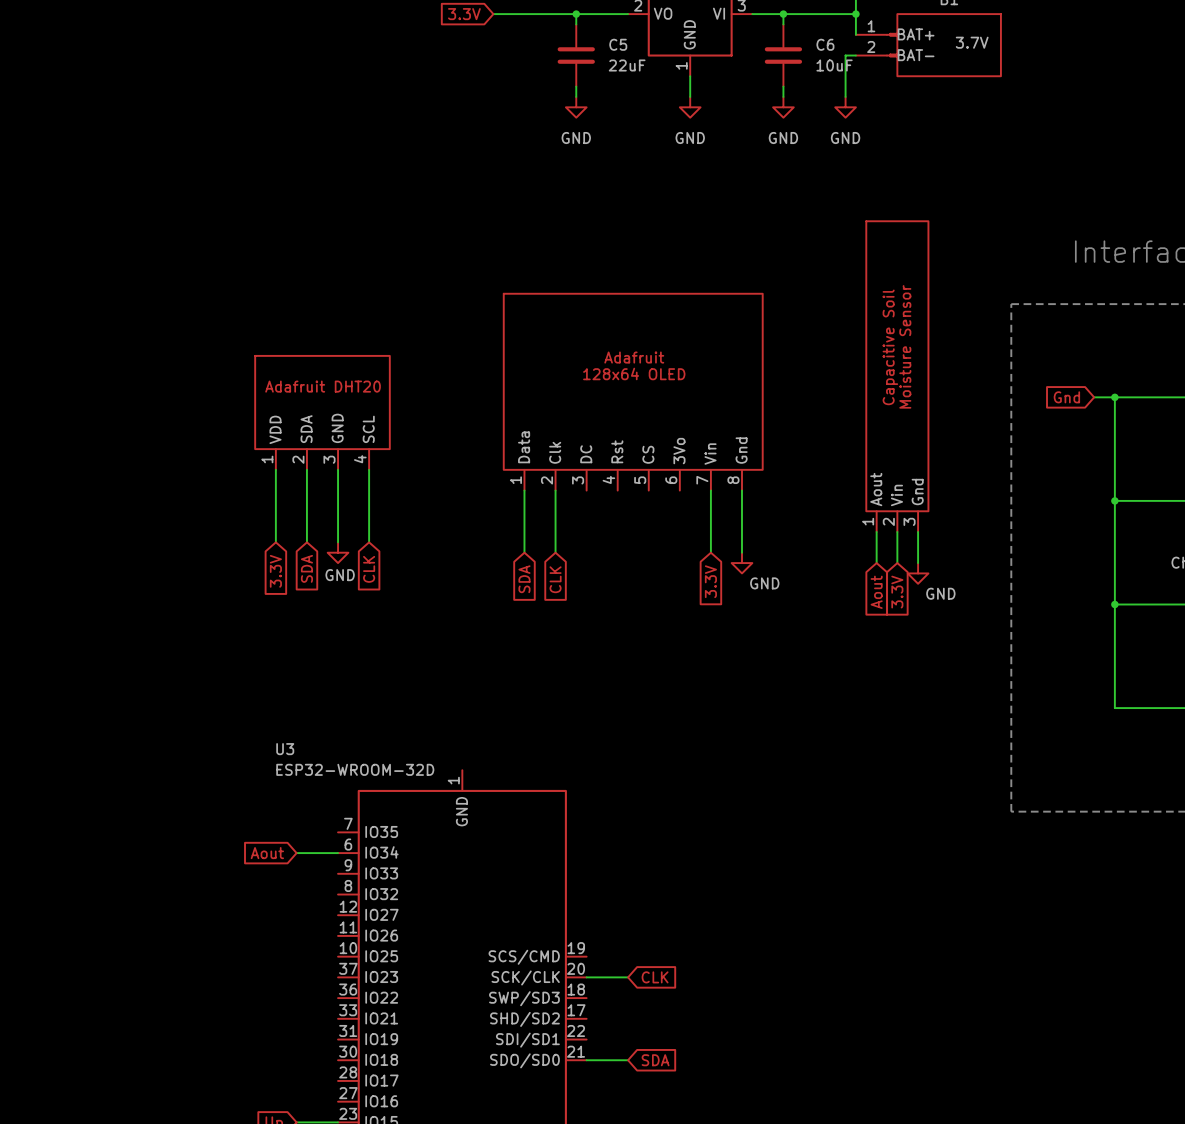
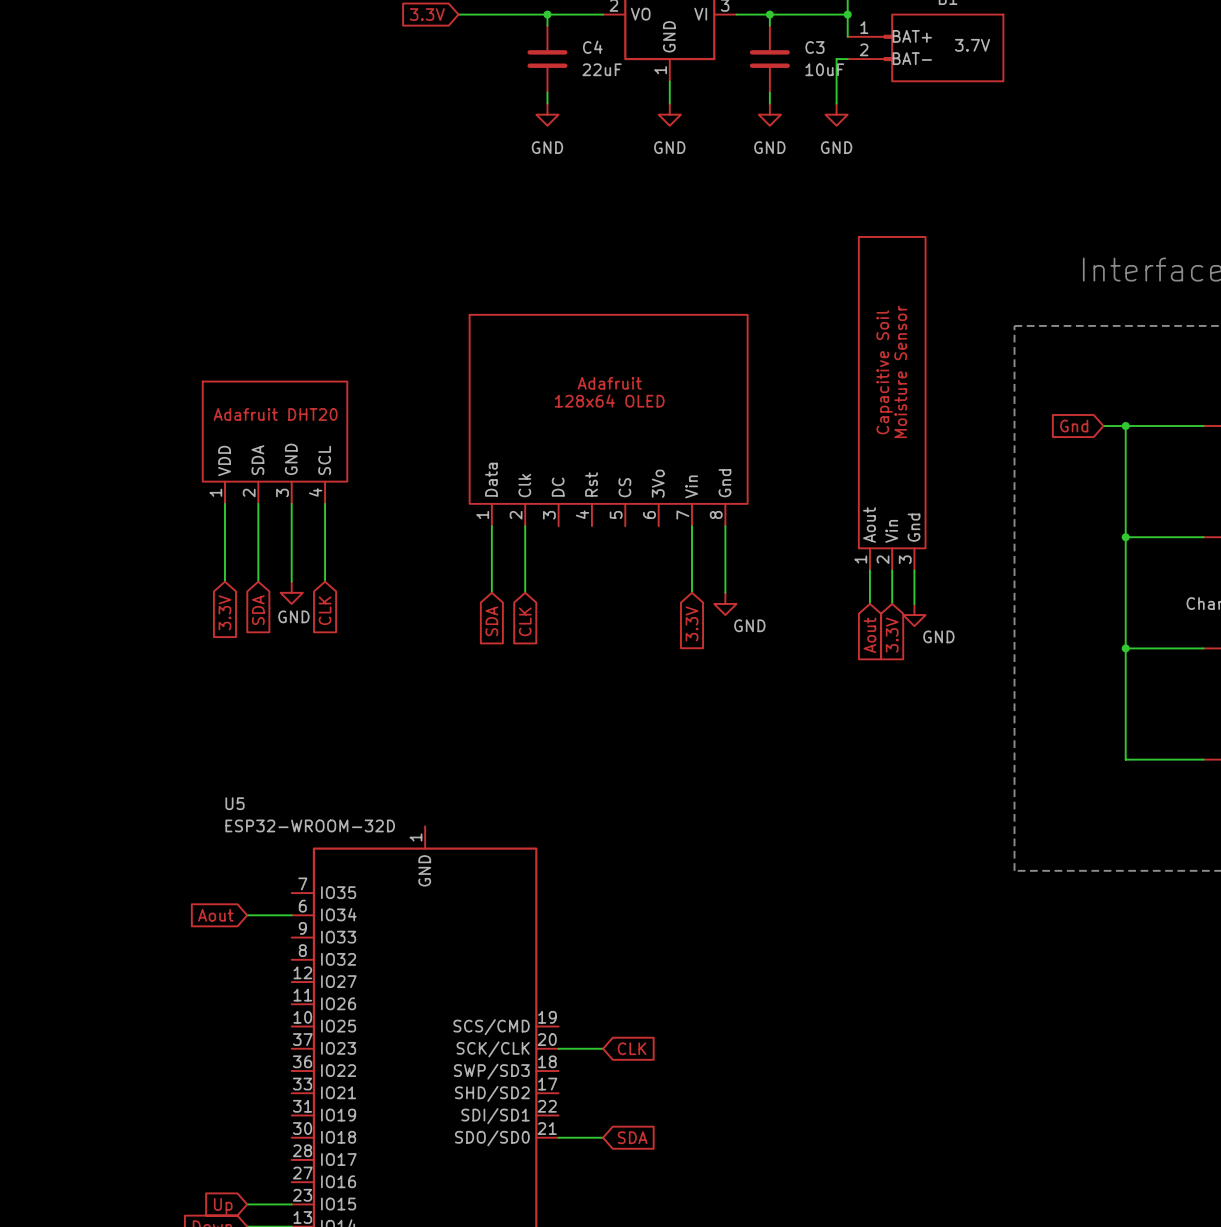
C5 name: C5 (618, 44) -> C4 (592, 47)
C6 name: C6 (825, 44) -> C3 (814, 47)
U3 name: U3 (285, 749) -> U5 (235, 803)

